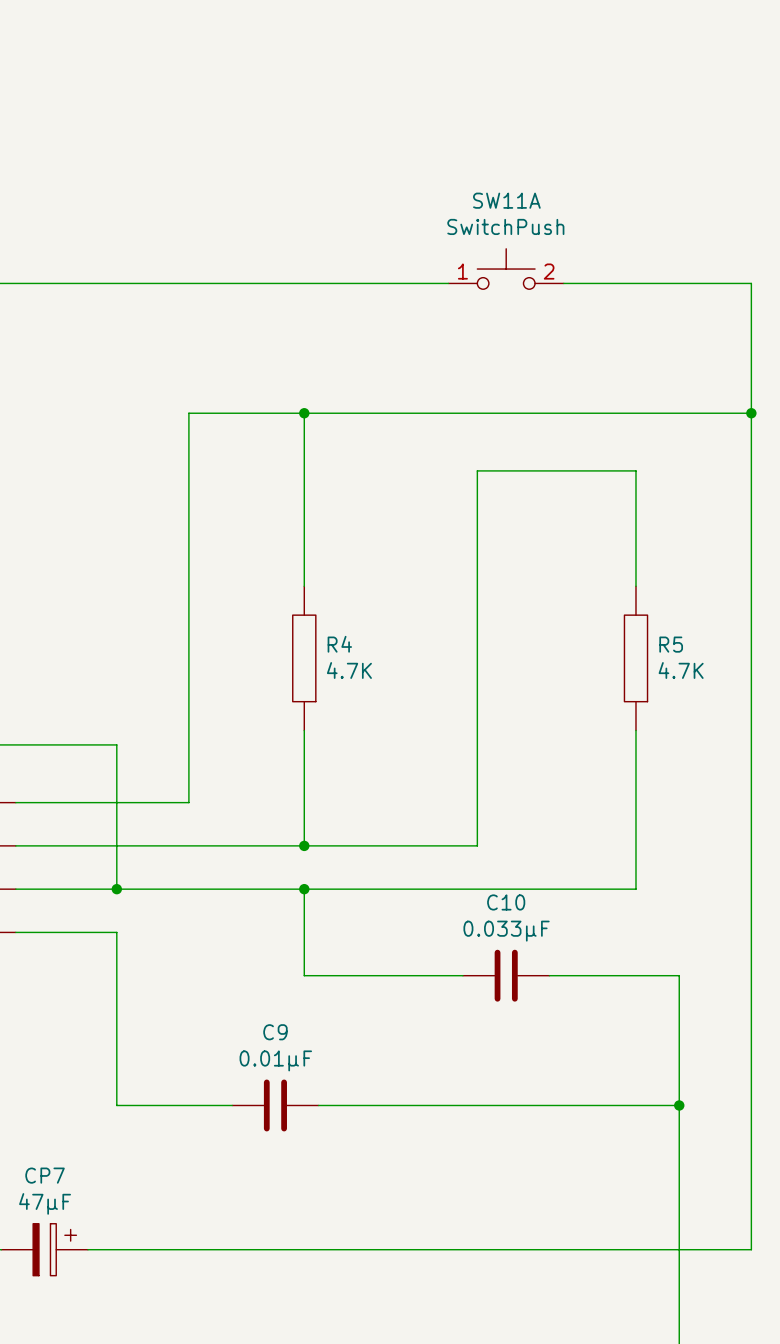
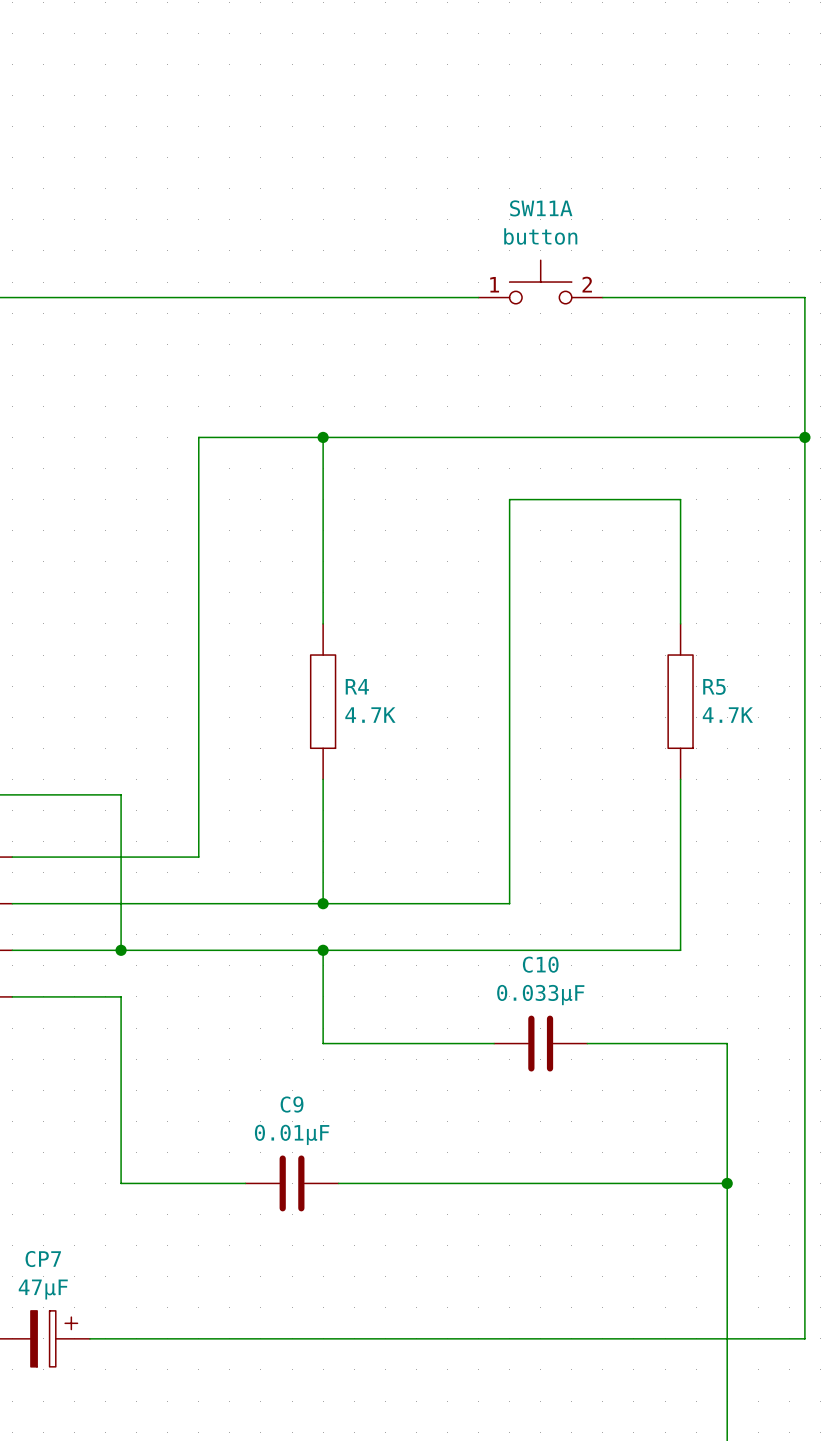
SW11A value: SwitchPush (505, 226) -> button (540, 236)

